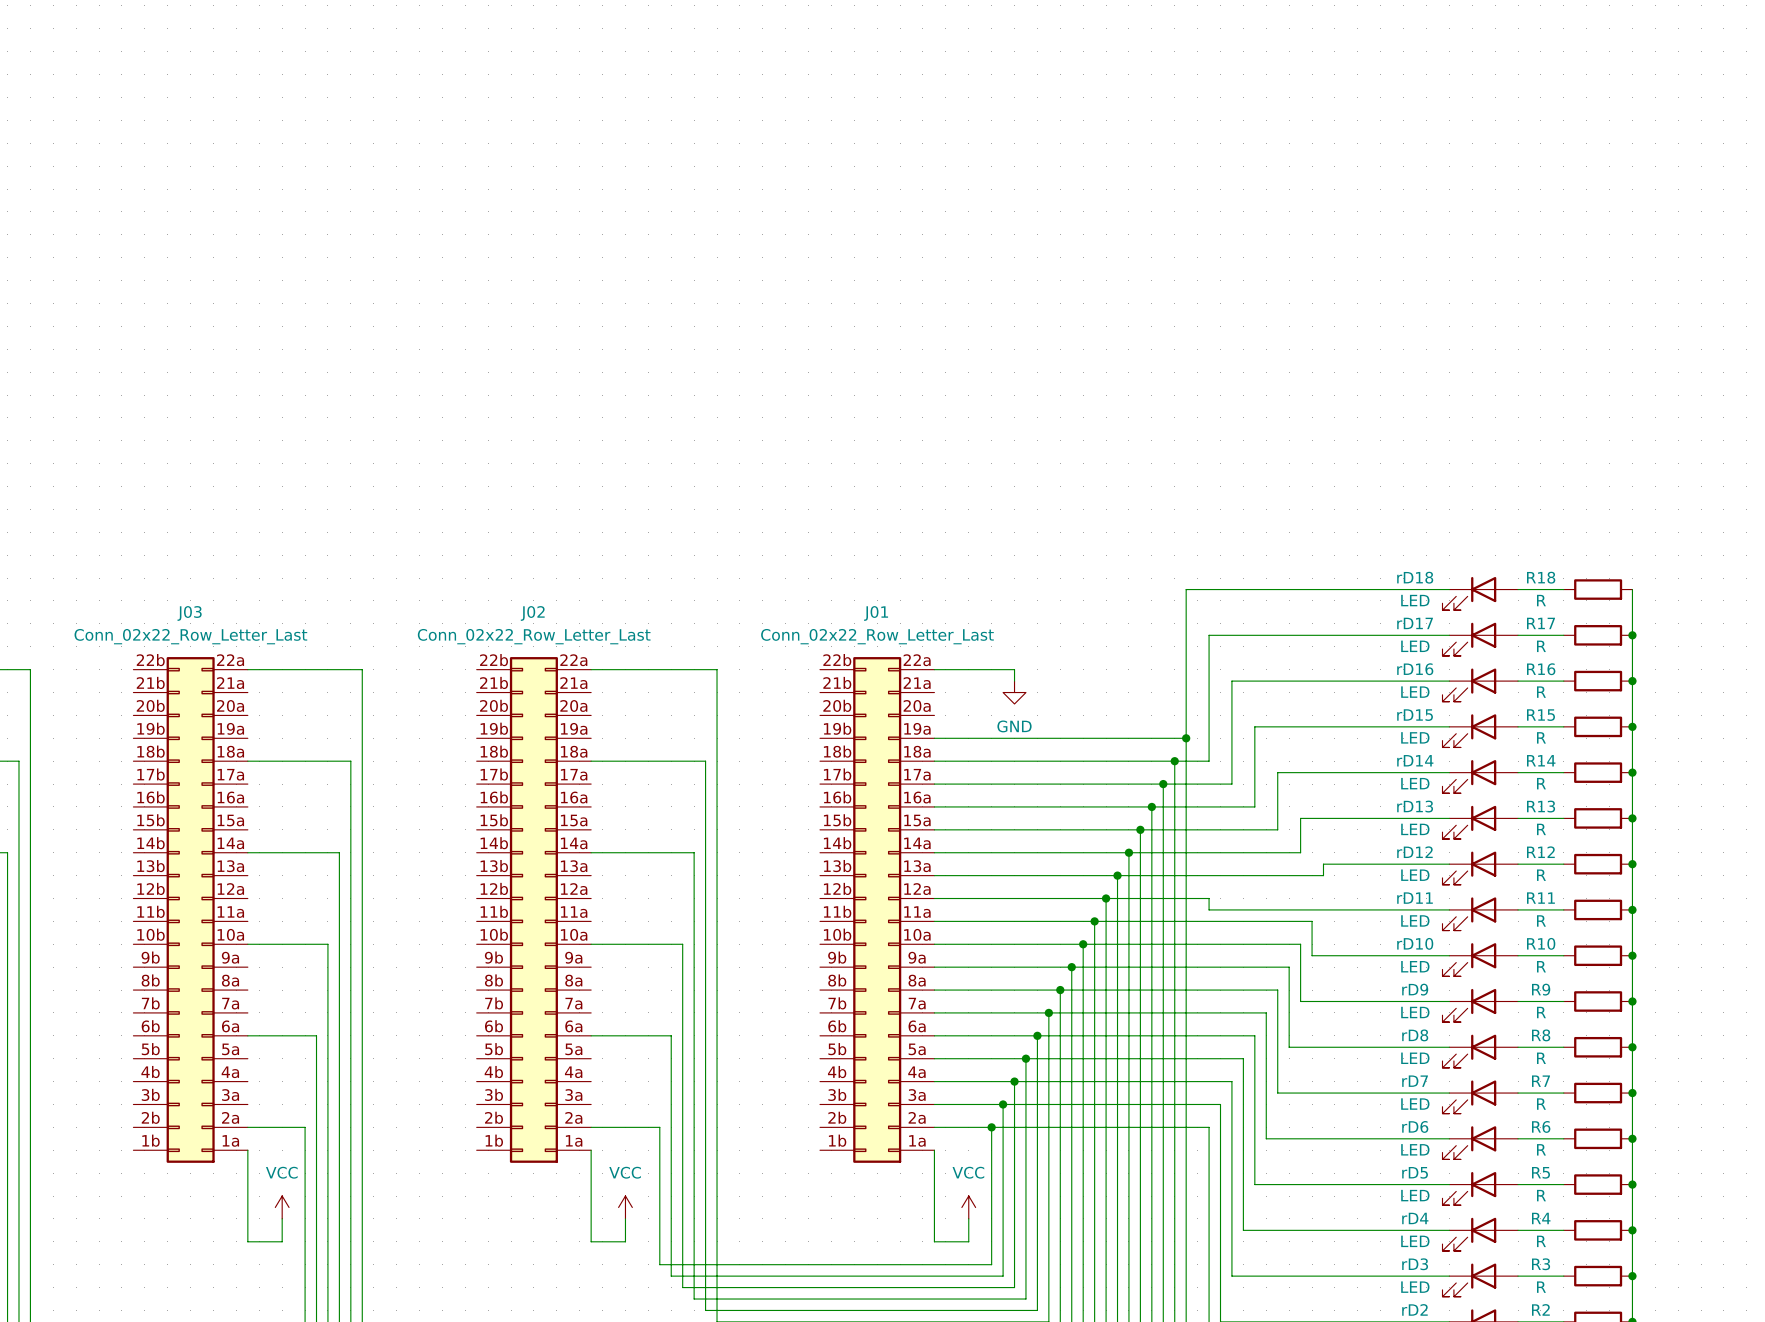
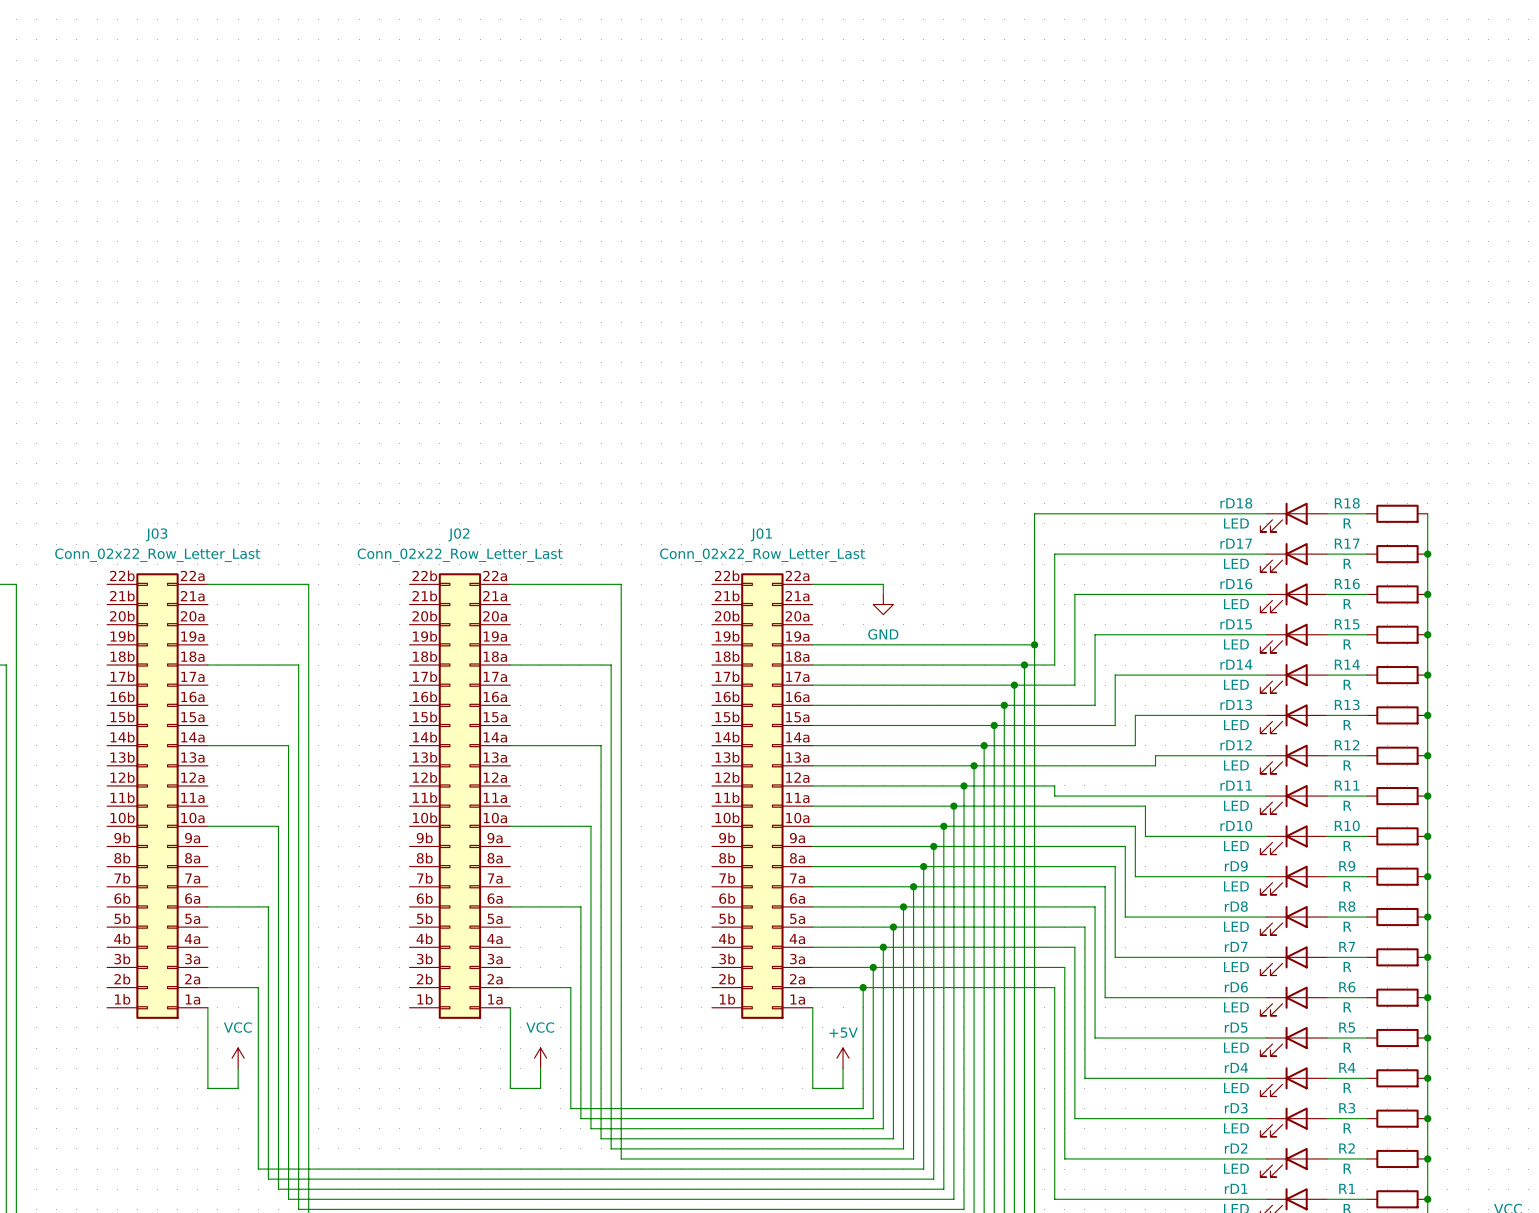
power symbol: VCC (968, 1207) -> +5V (843, 1058)

